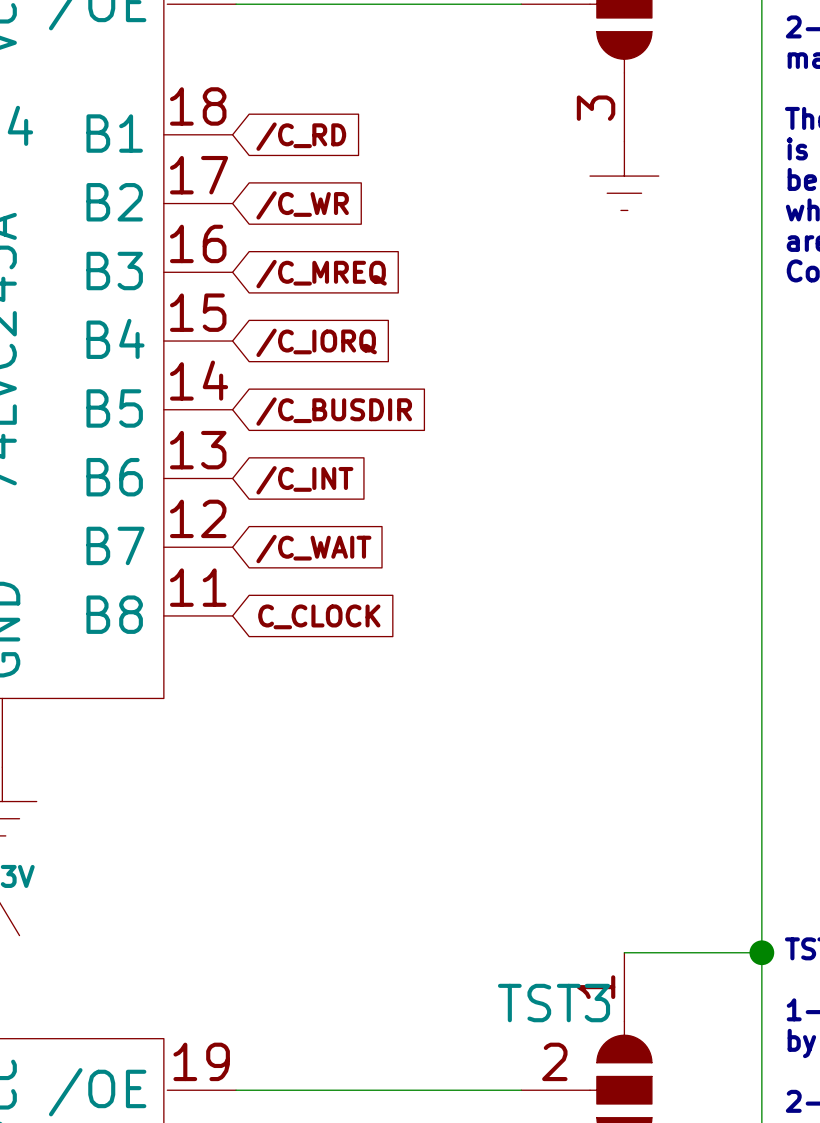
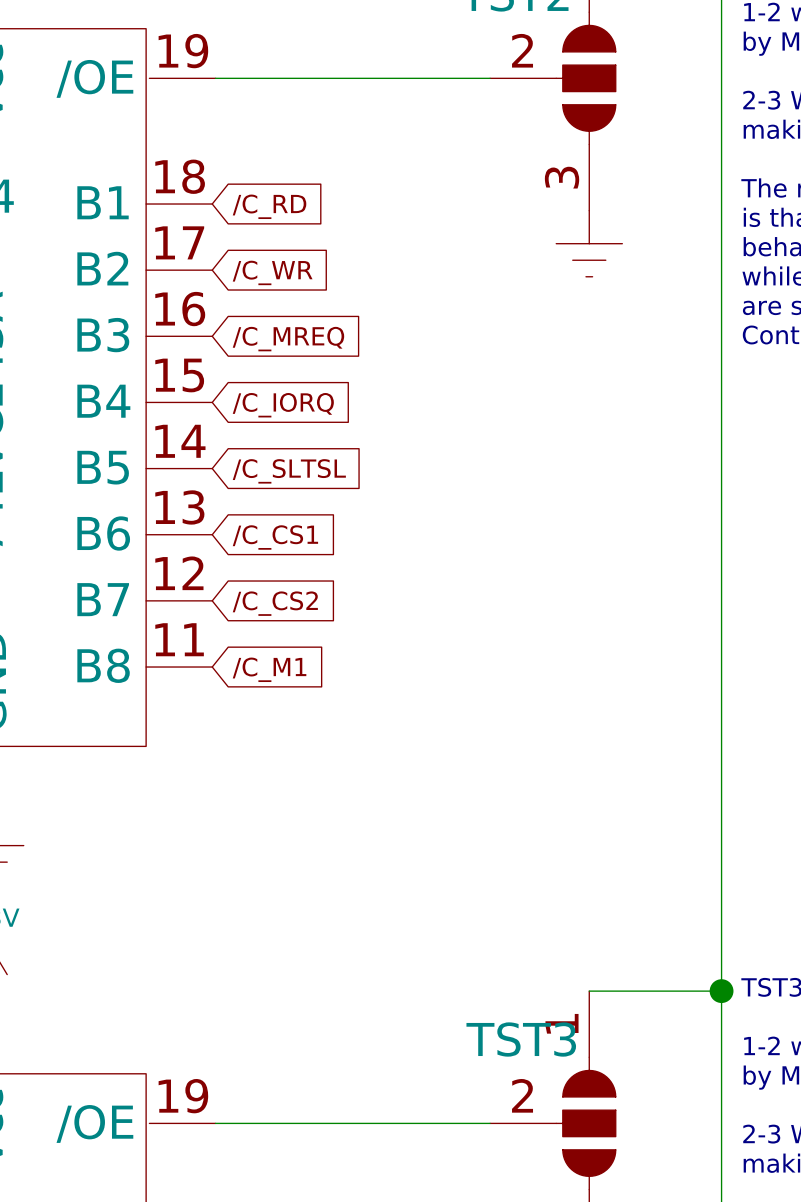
global label: /C_BUSDIR (334, 411) -> /C_SLTSL (289, 471)
global label: /C_INT (304, 480) -> /C_CS1 (275, 537)
global label: /C_WAIT (313, 549) -> /C_CS2 (275, 603)
global label: C_CLOCK (319, 616) -> /C_M1 (269, 669)

